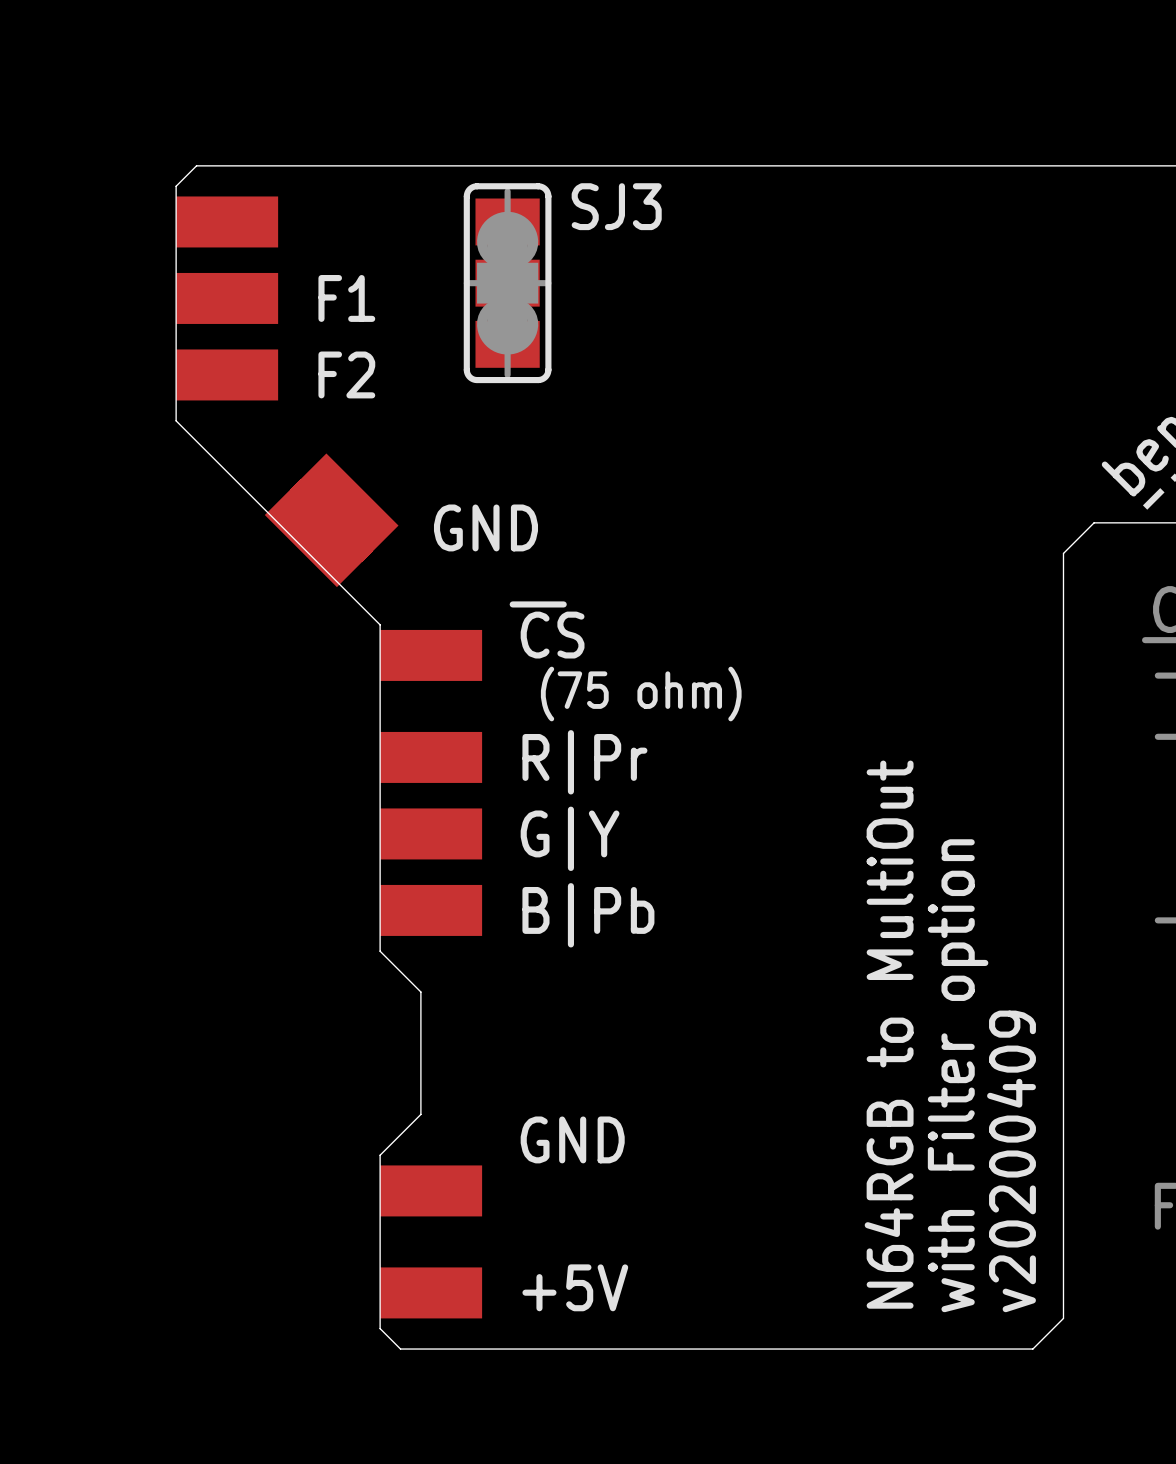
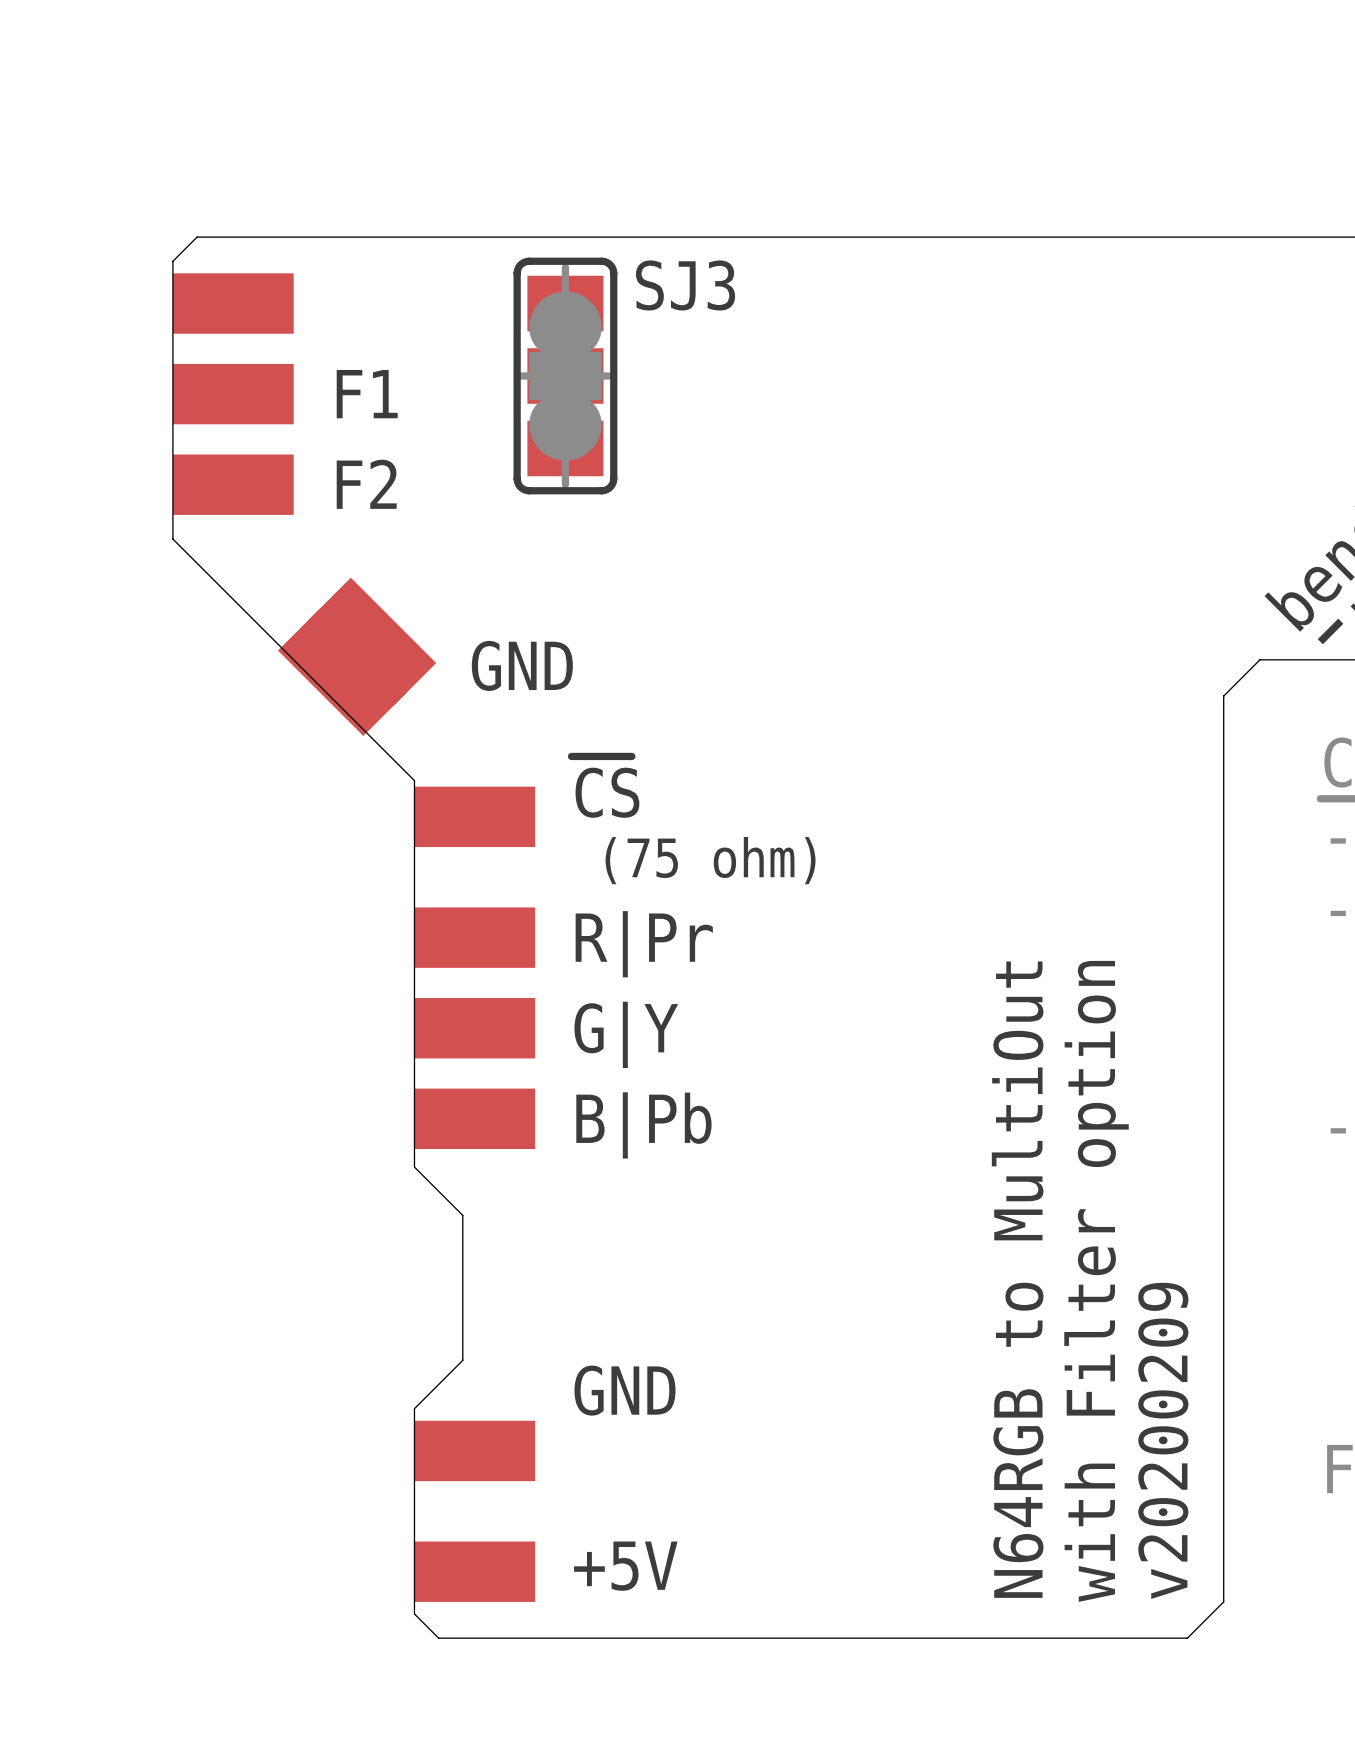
text: v20200409 (1011, 1161) -> v20200209 (1163, 1440)

